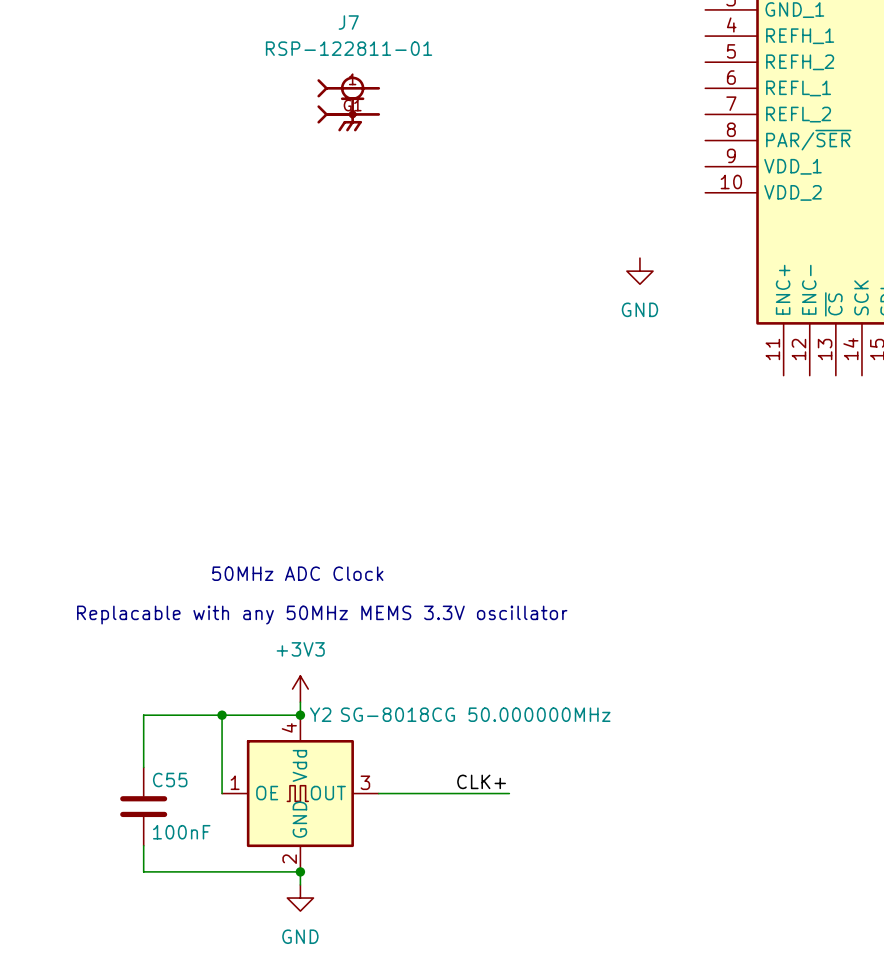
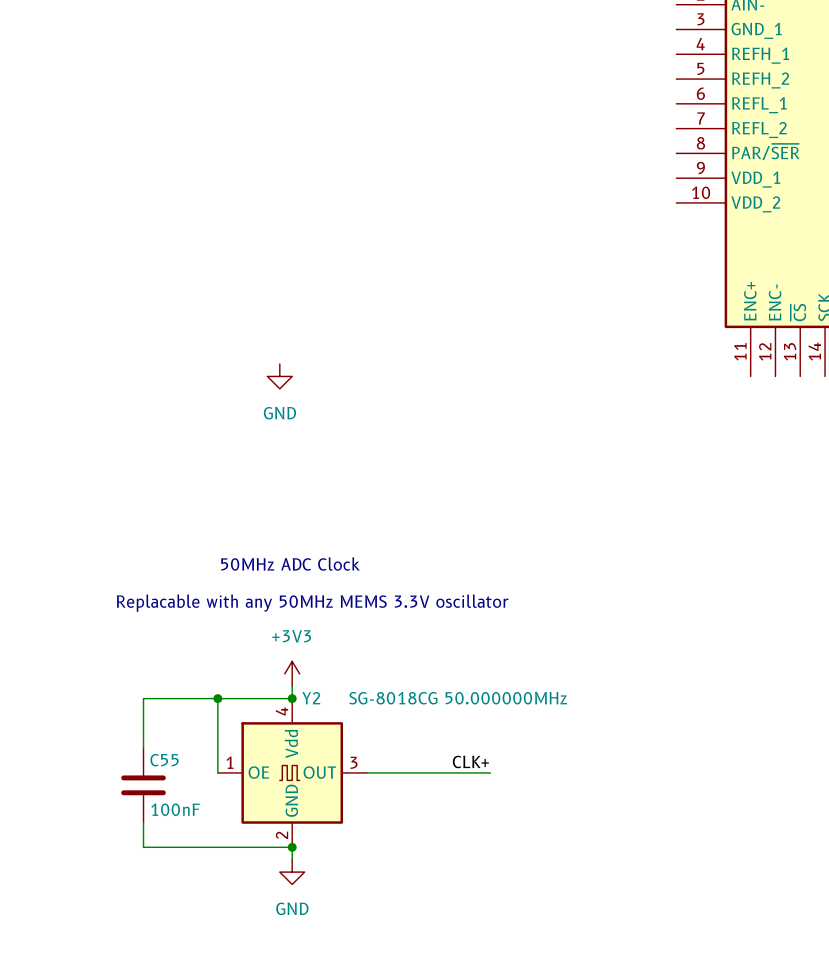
J7: RSP-122811-01 (348, 103) -> none
power symbol: GND (639, 271) -> none
power symbol: none -> GND (279, 376)

